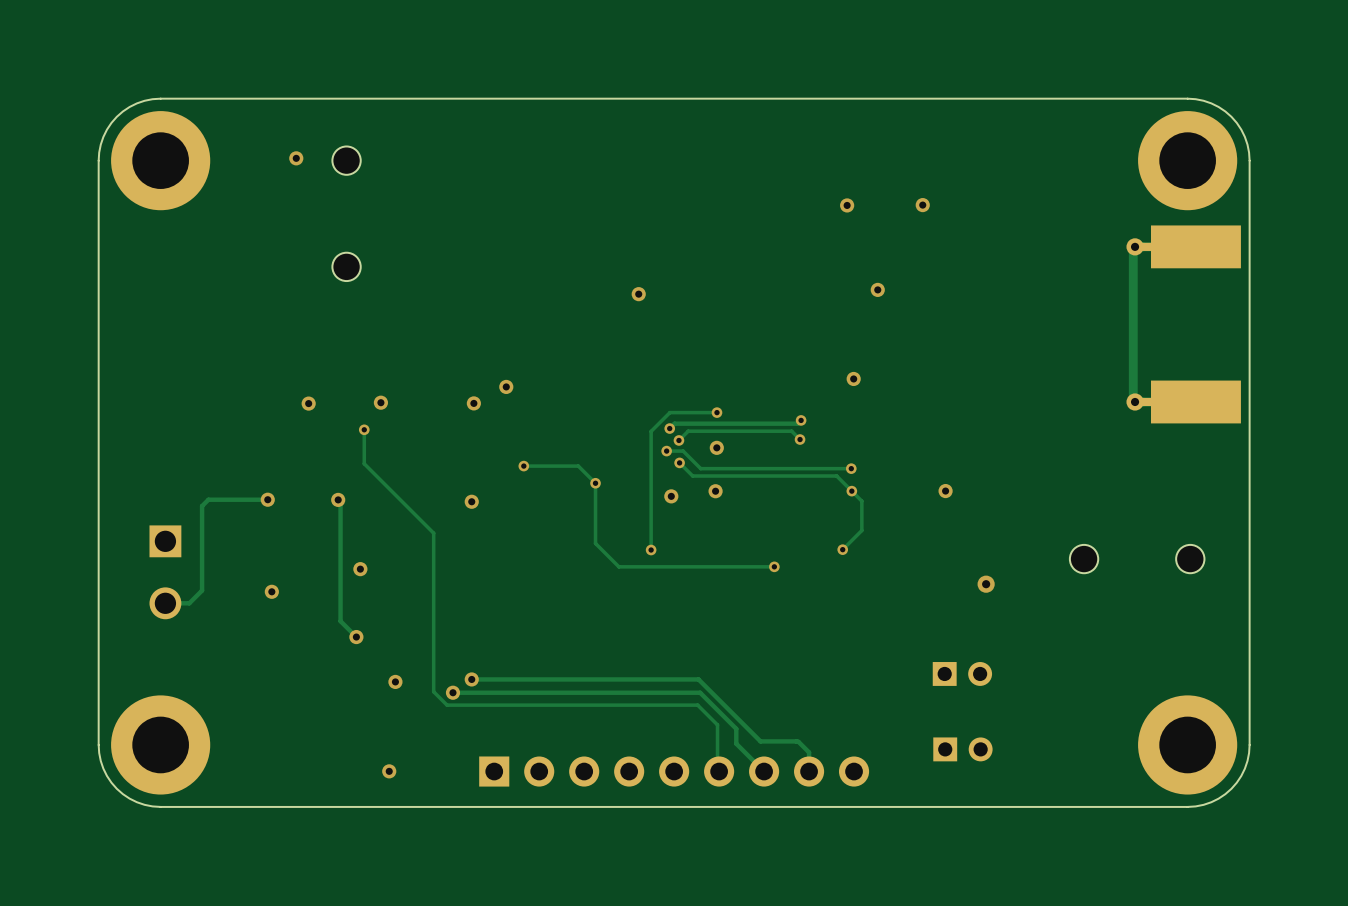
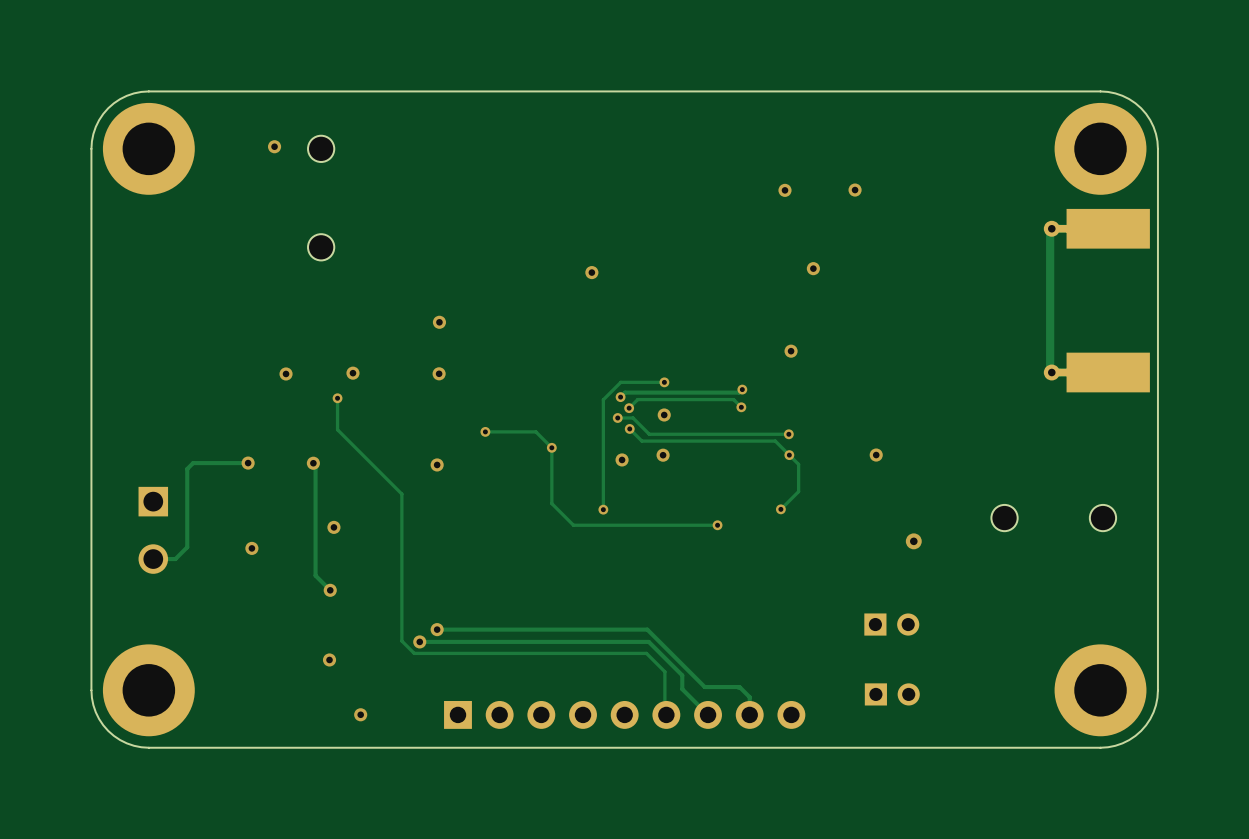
via position: (506, 386) -> (439, 322)
via position: (395, 681) -> (329, 659)

